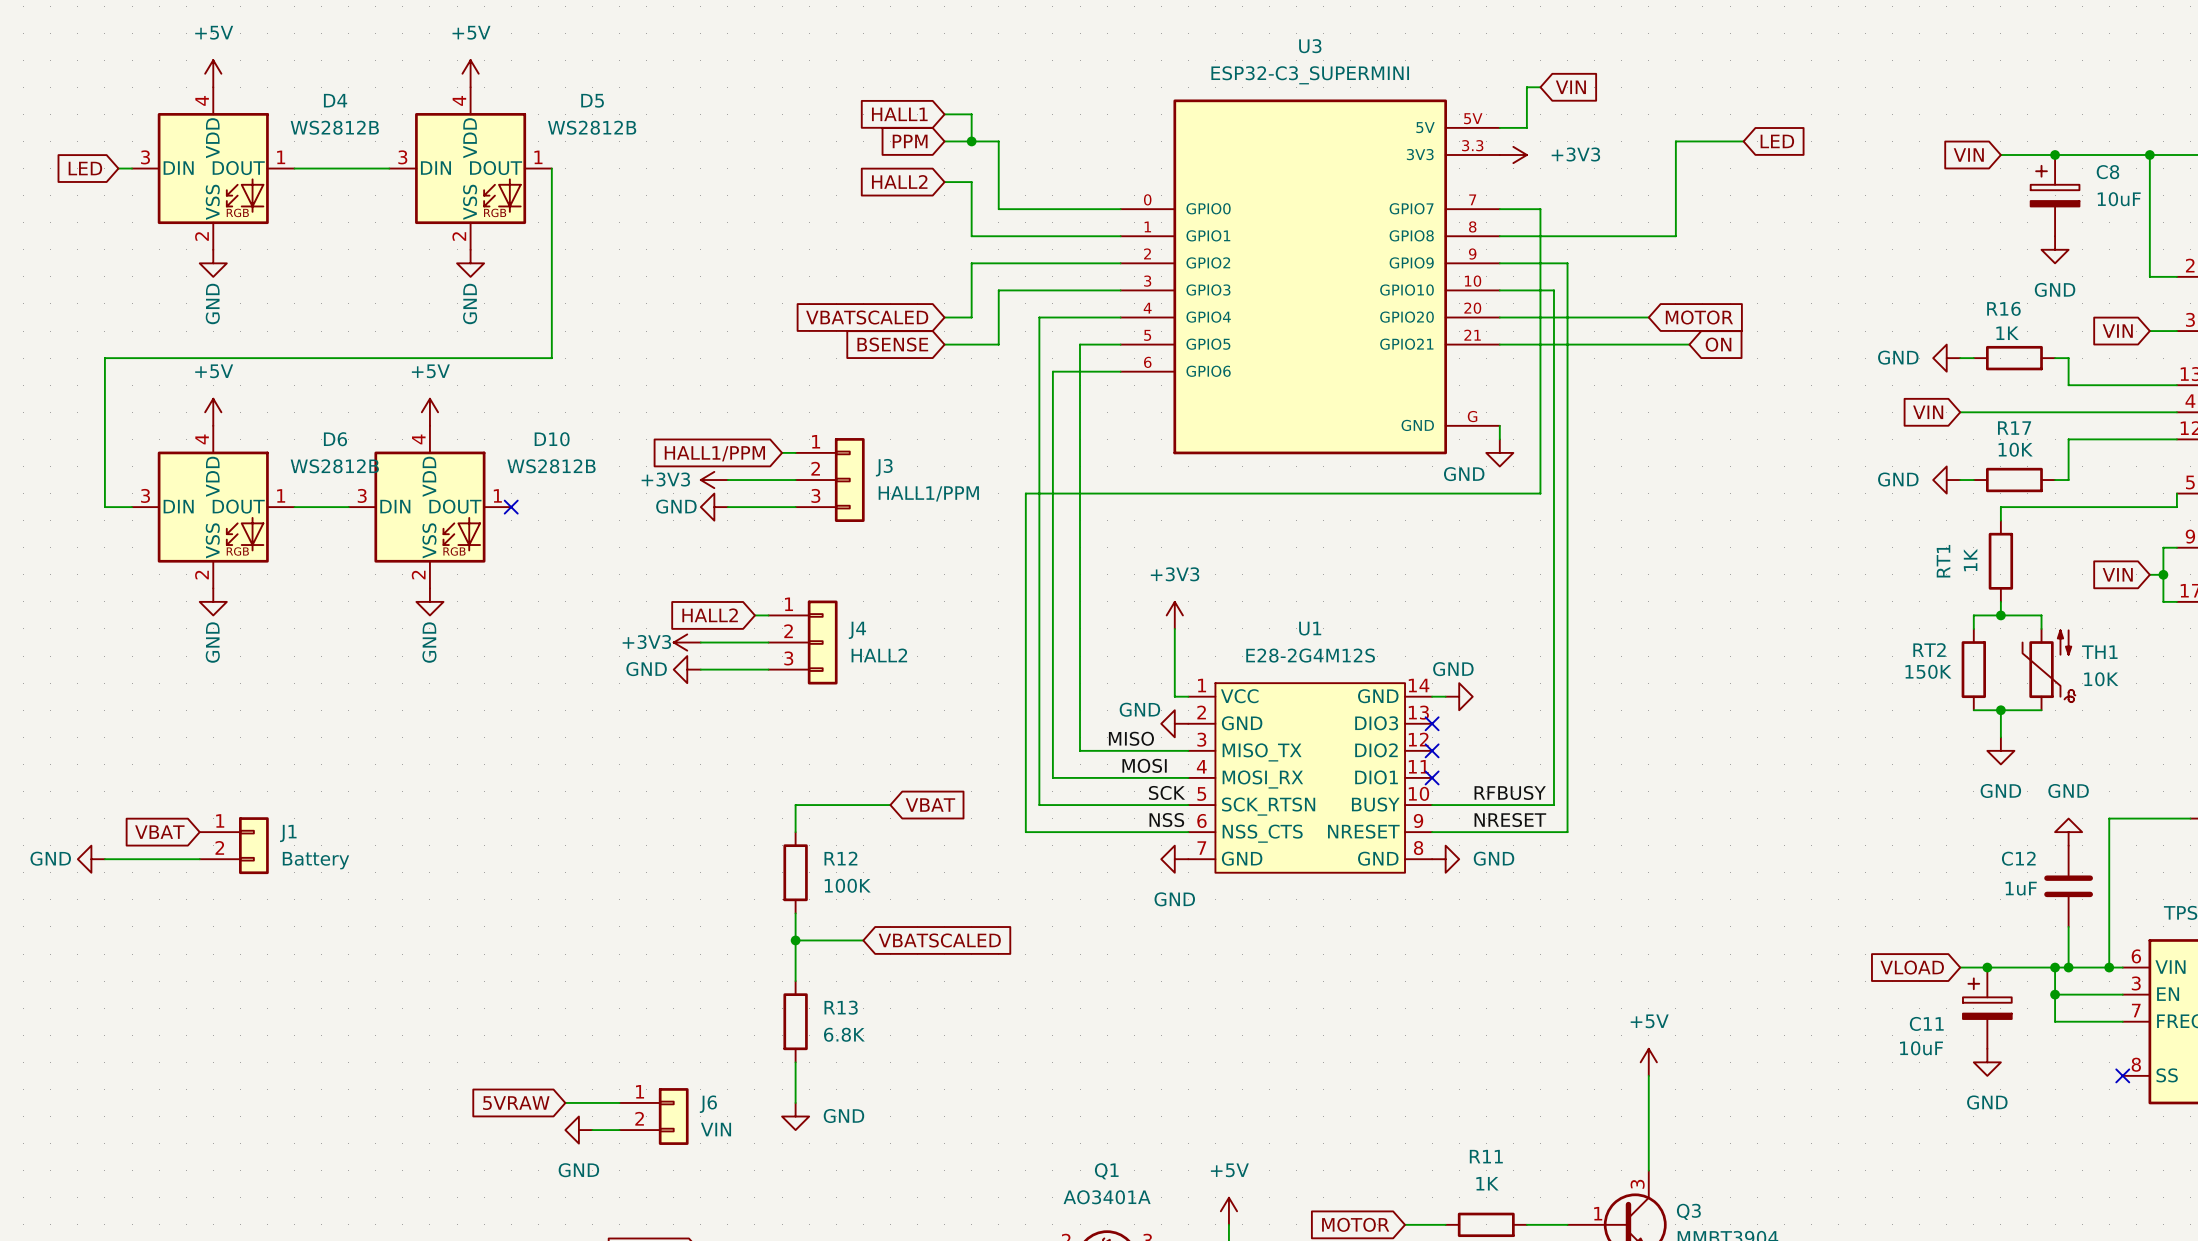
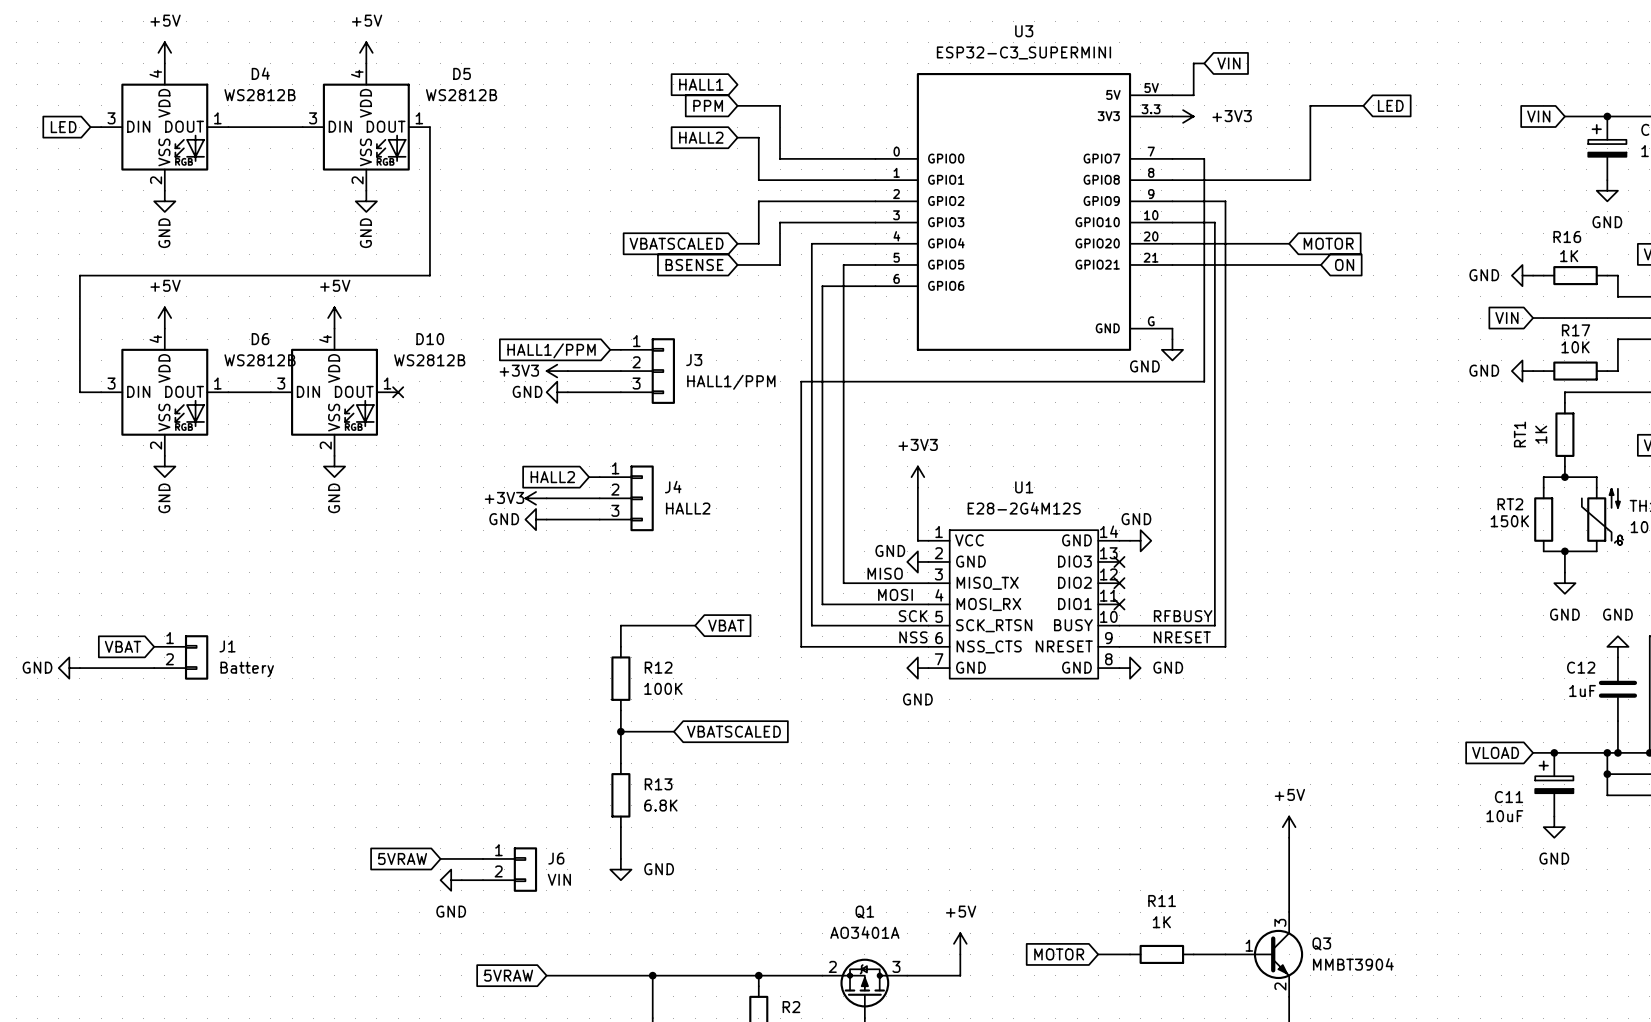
wire: (944, 114) (971, 114) (971, 141) -> none
junction: (971, 141) -> none

